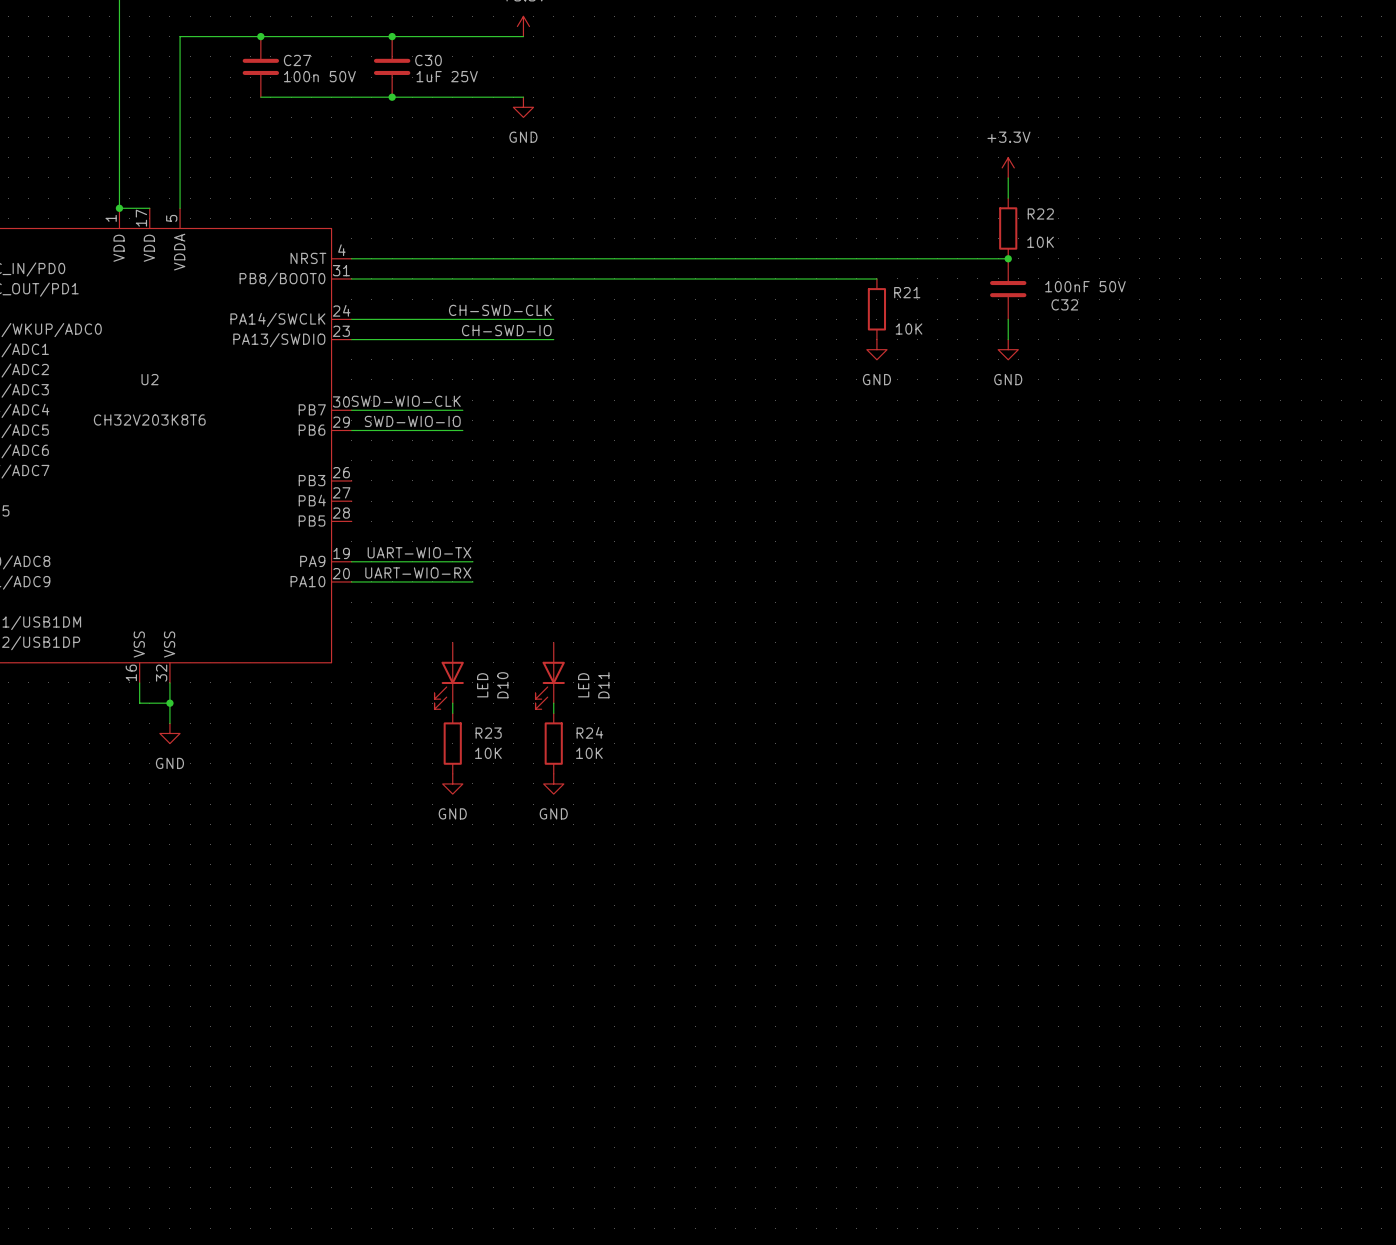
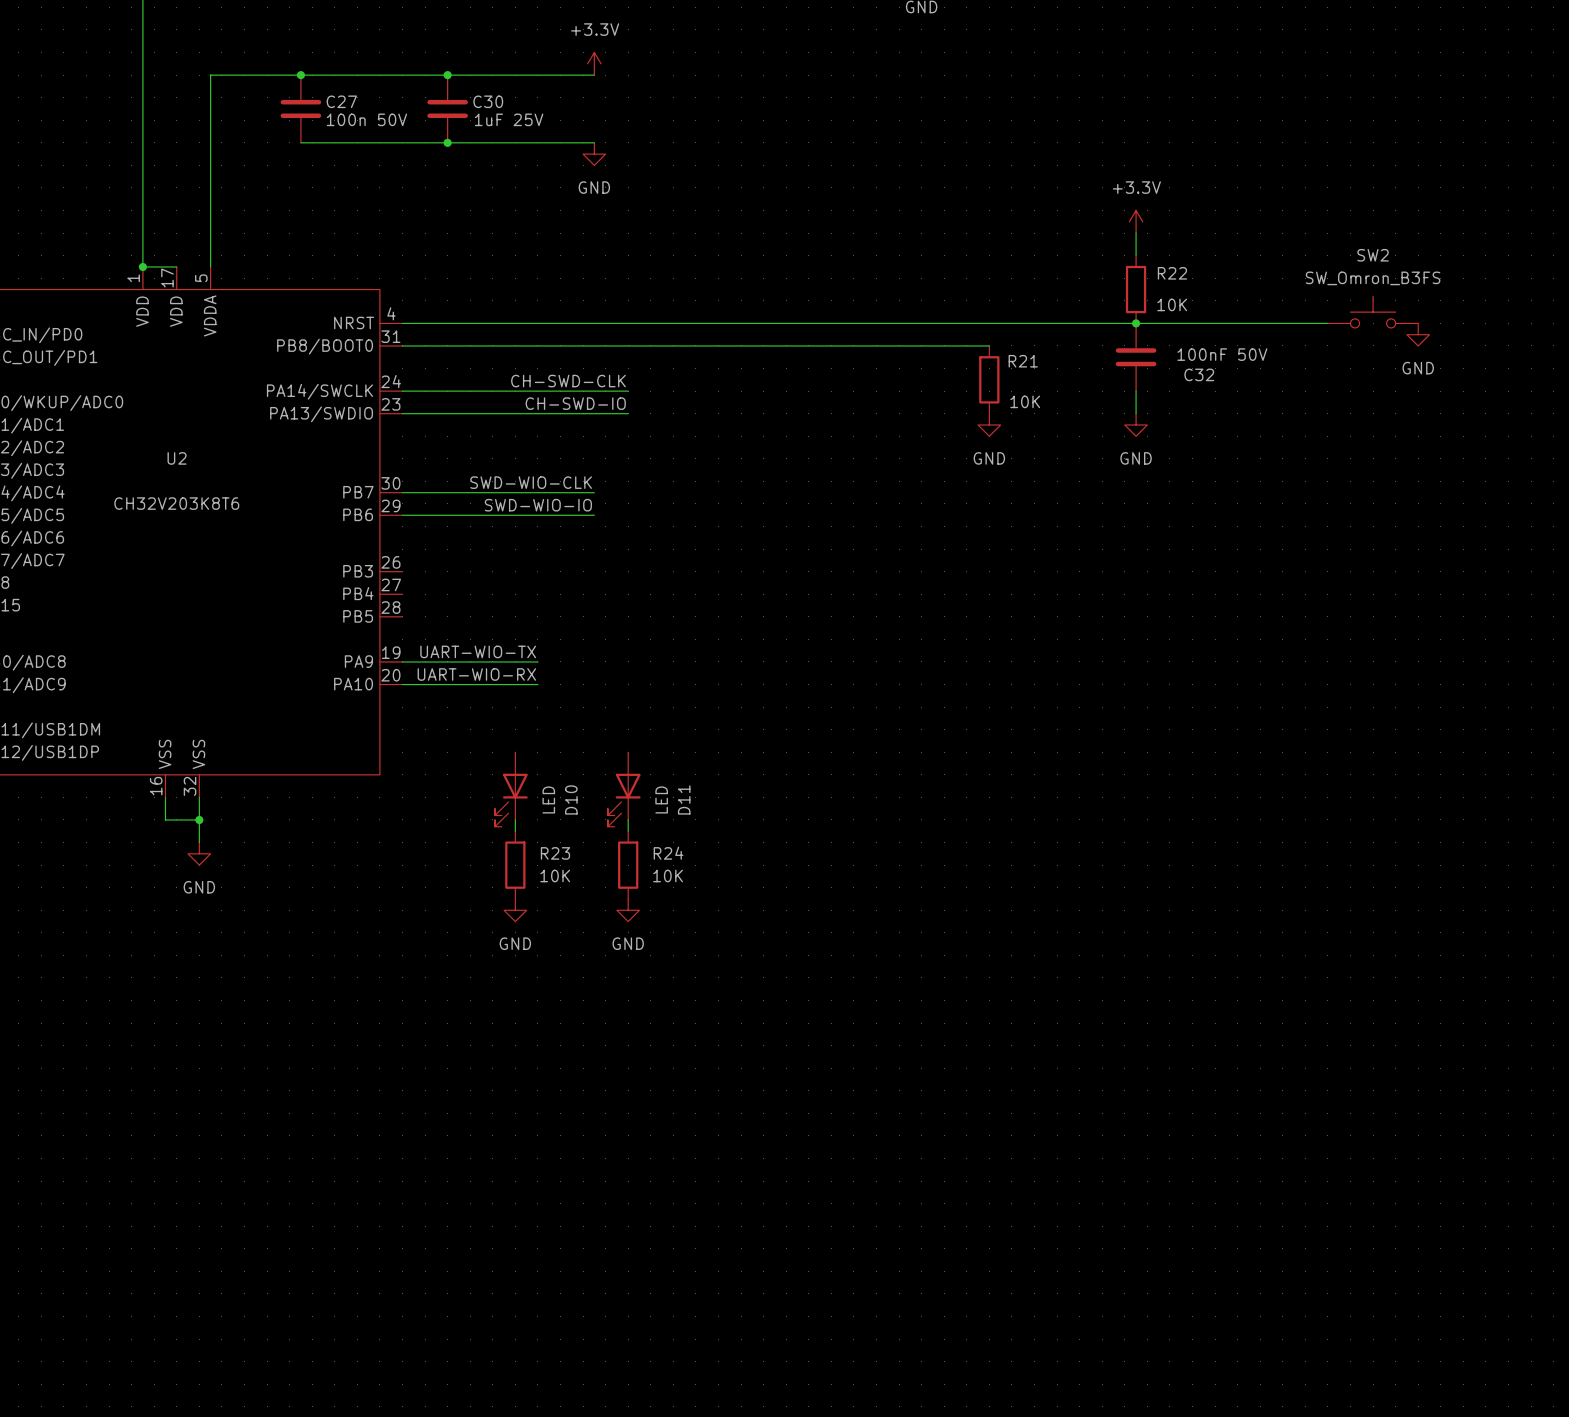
SW2: none -> SW_Omron_B3FS (1373, 312)
wire: none -> (1136, 323) (1327, 323)
power symbol: none -> GND (1418, 334)
label position: SWD-WIO-CLK (406, 401) -> SWD-WIO-CLK (531, 482)
wire: none -> (526, 492) (594, 492)
label position: SWD-WIO-IO (412, 421) -> SWD-WIO-IO (538, 505)
wire: none -> (526, 515) (594, 515)

